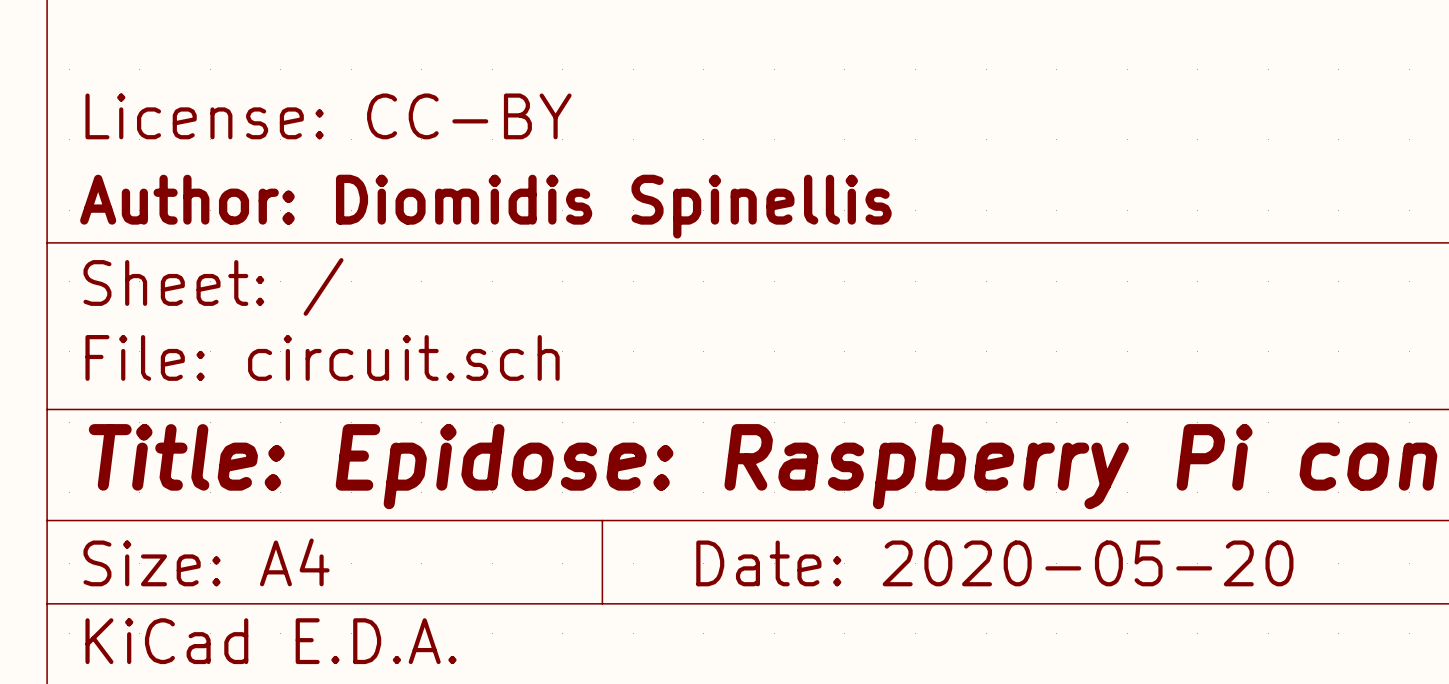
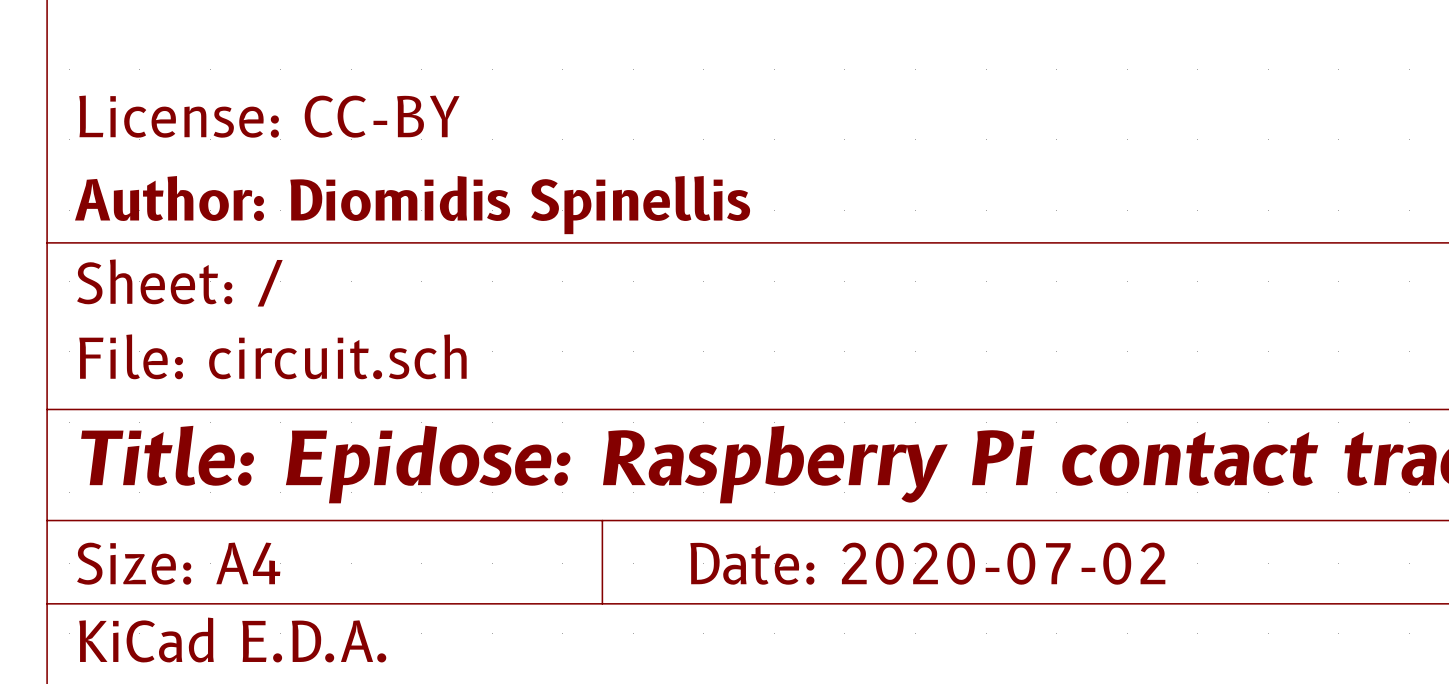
title block: Date: 2020-05-20 (994, 563) -> Date: 2020-07-02 (927, 563)

